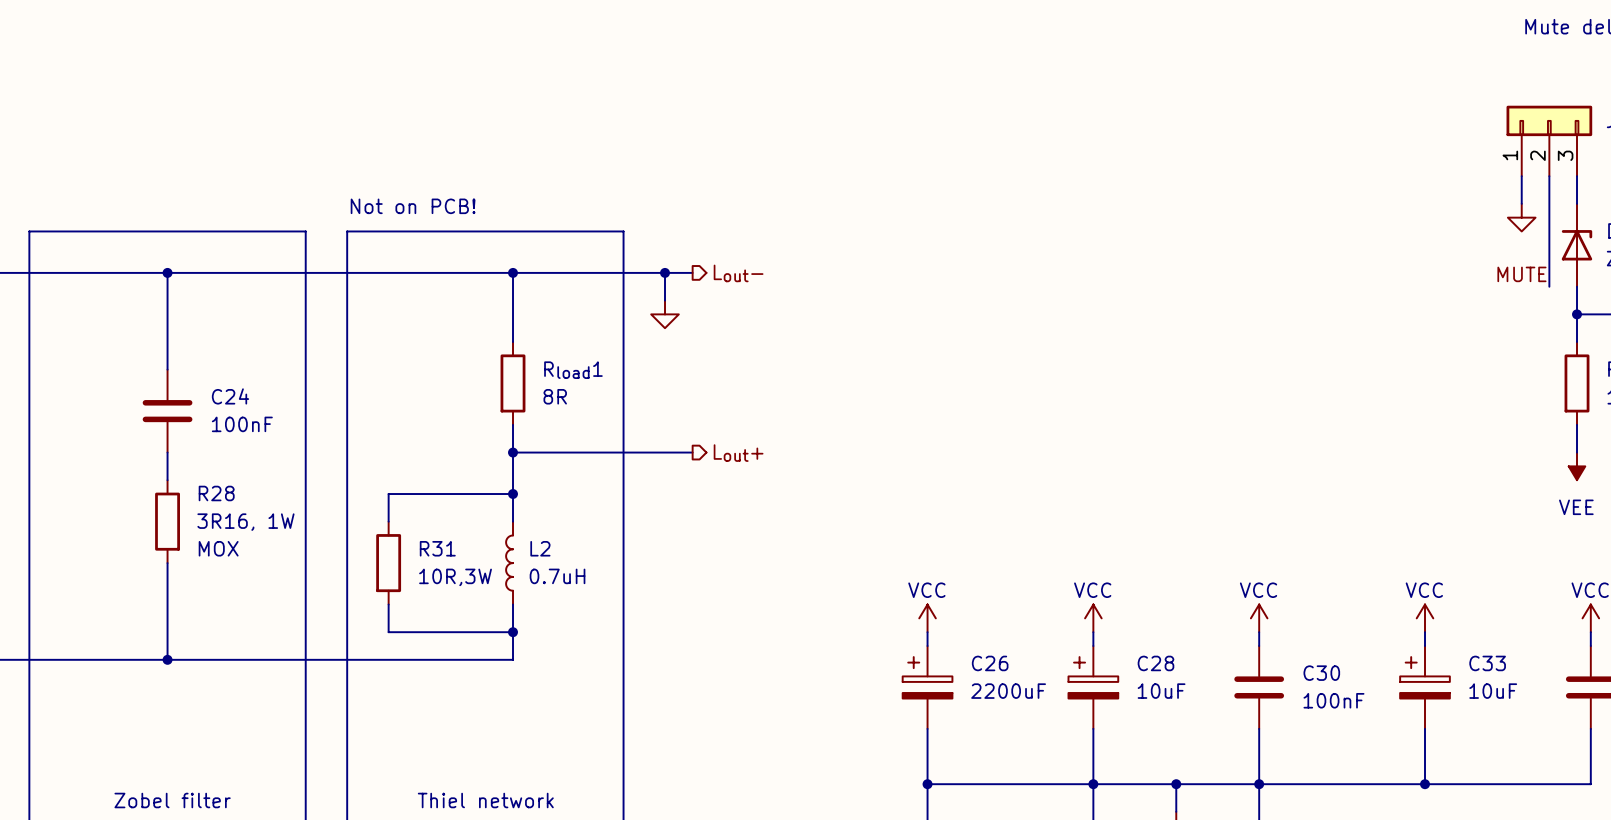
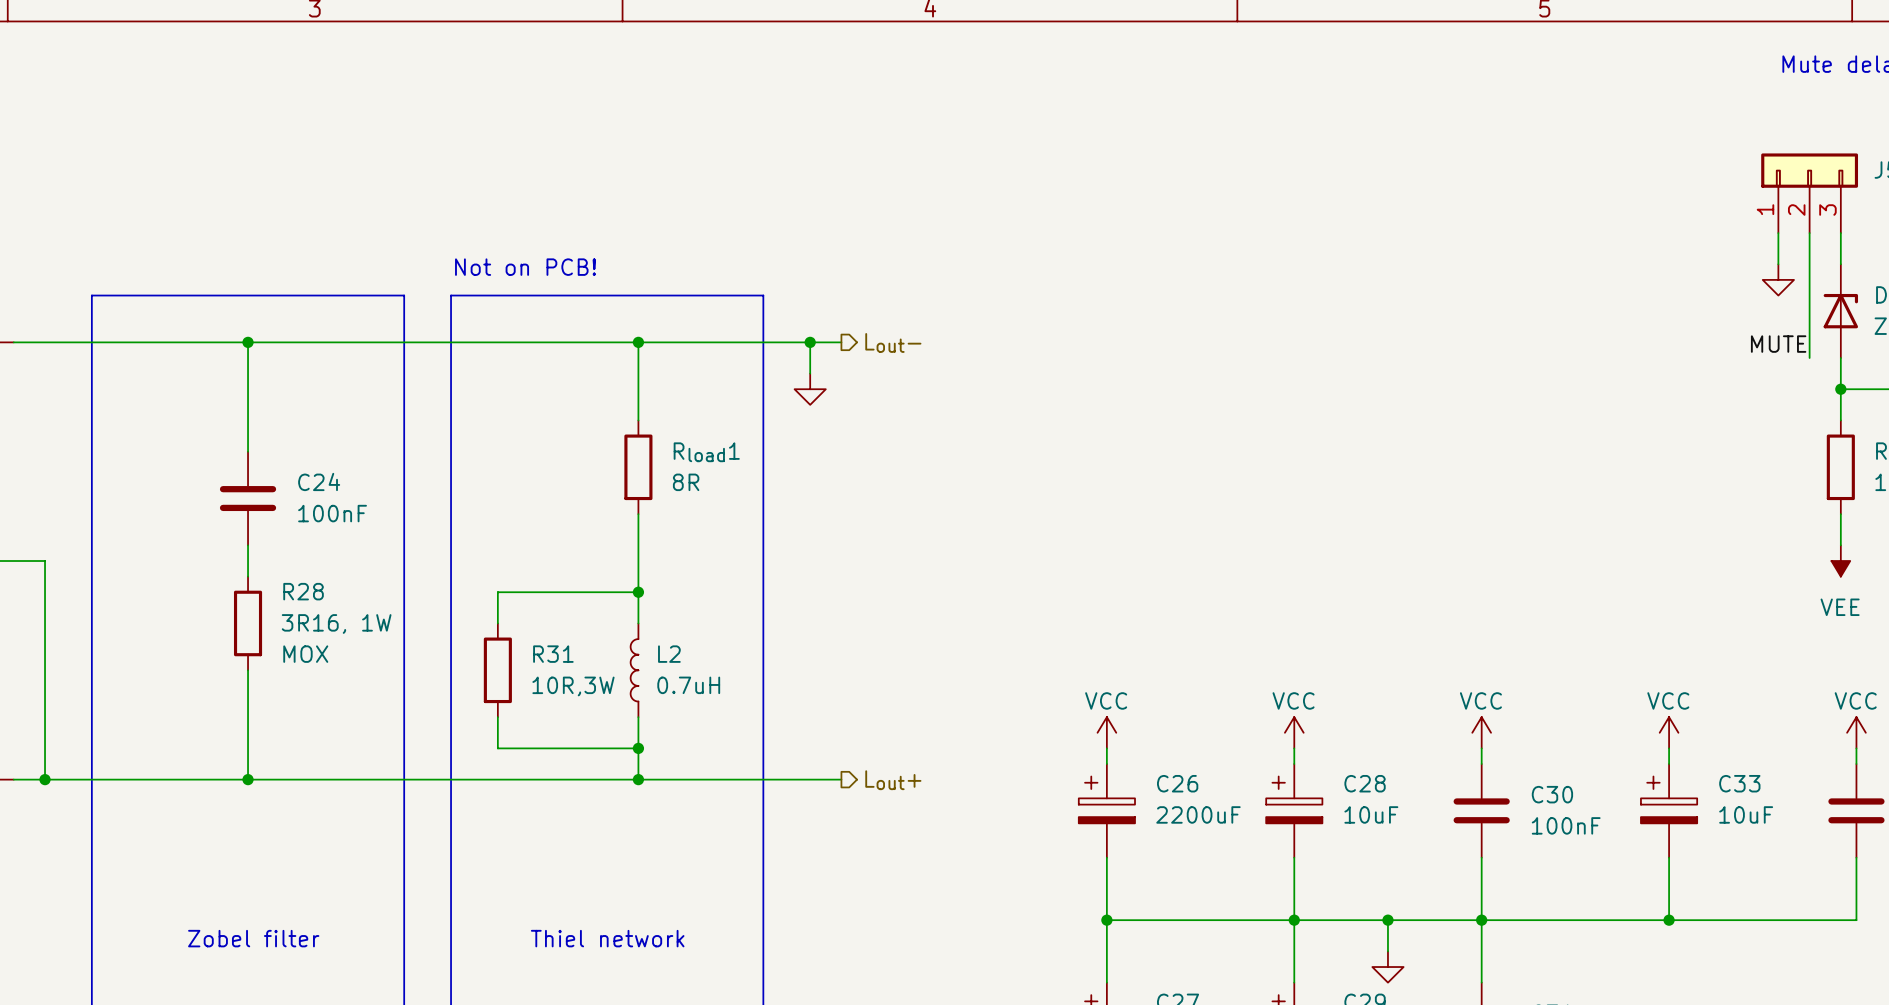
wire: (513, 452) (692, 452) -> (638, 779) (841, 779)
junction: (513, 452) -> none
hierarchical label position: Lout+ (738, 453) -> Lout+ (893, 780)
junction: none -> (638, 779)

